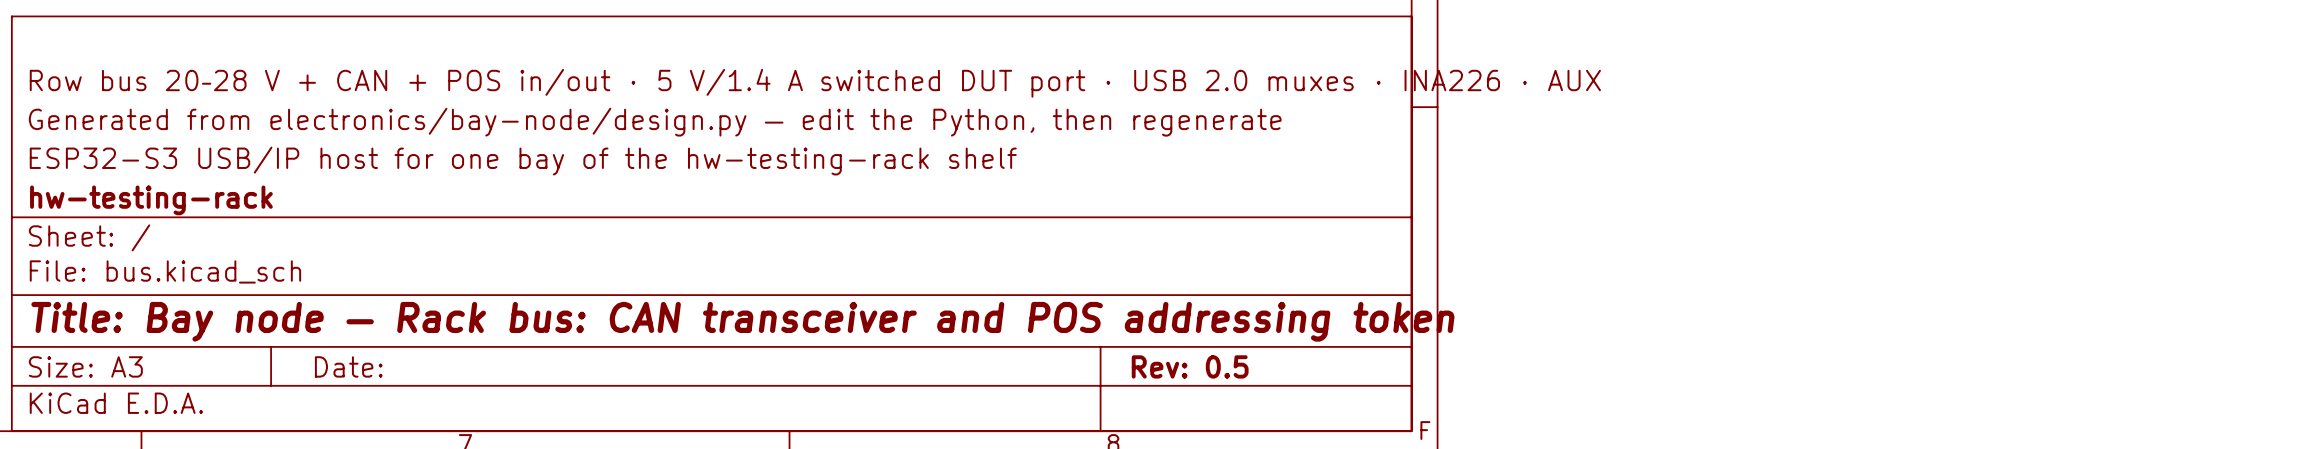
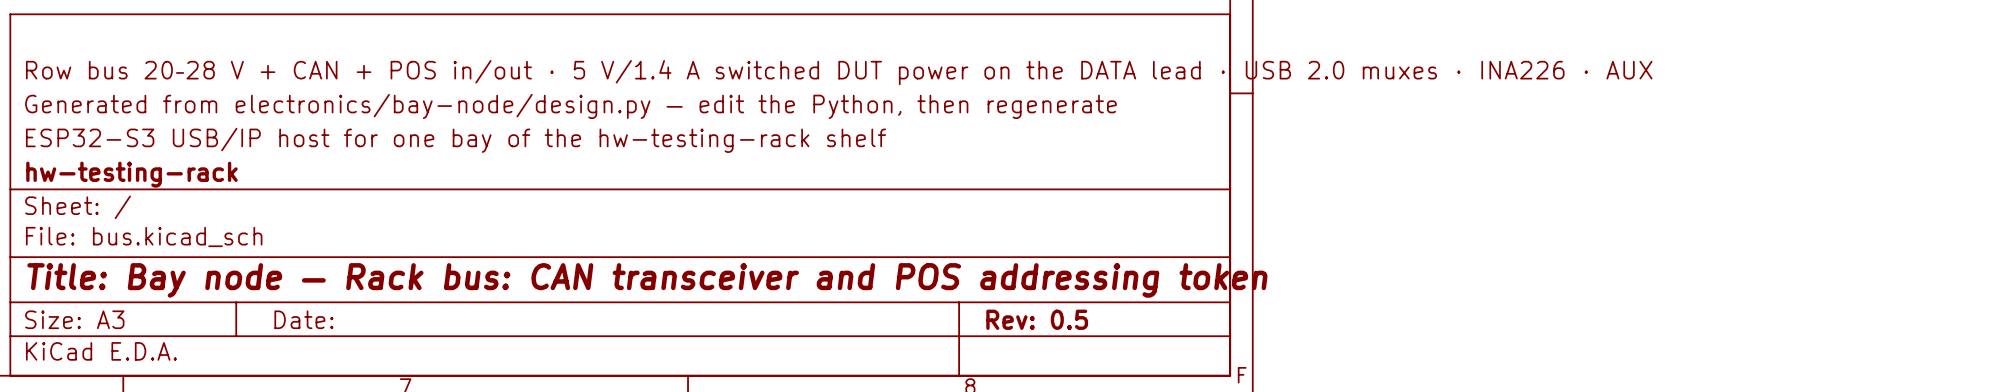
title block: Row bus 20–28 V + CAN + POS in/out · 5 V/1.4 A switched DUT port · USB 2.0 muxes · INA226 · AUX (815, 83) -> Row bus 20–28 V + CAN + POS in/out · 5 V/1.4 A switched DUT power on the DATA lead · USB 2.0 muxes · INA226 · AUX (839, 72)

